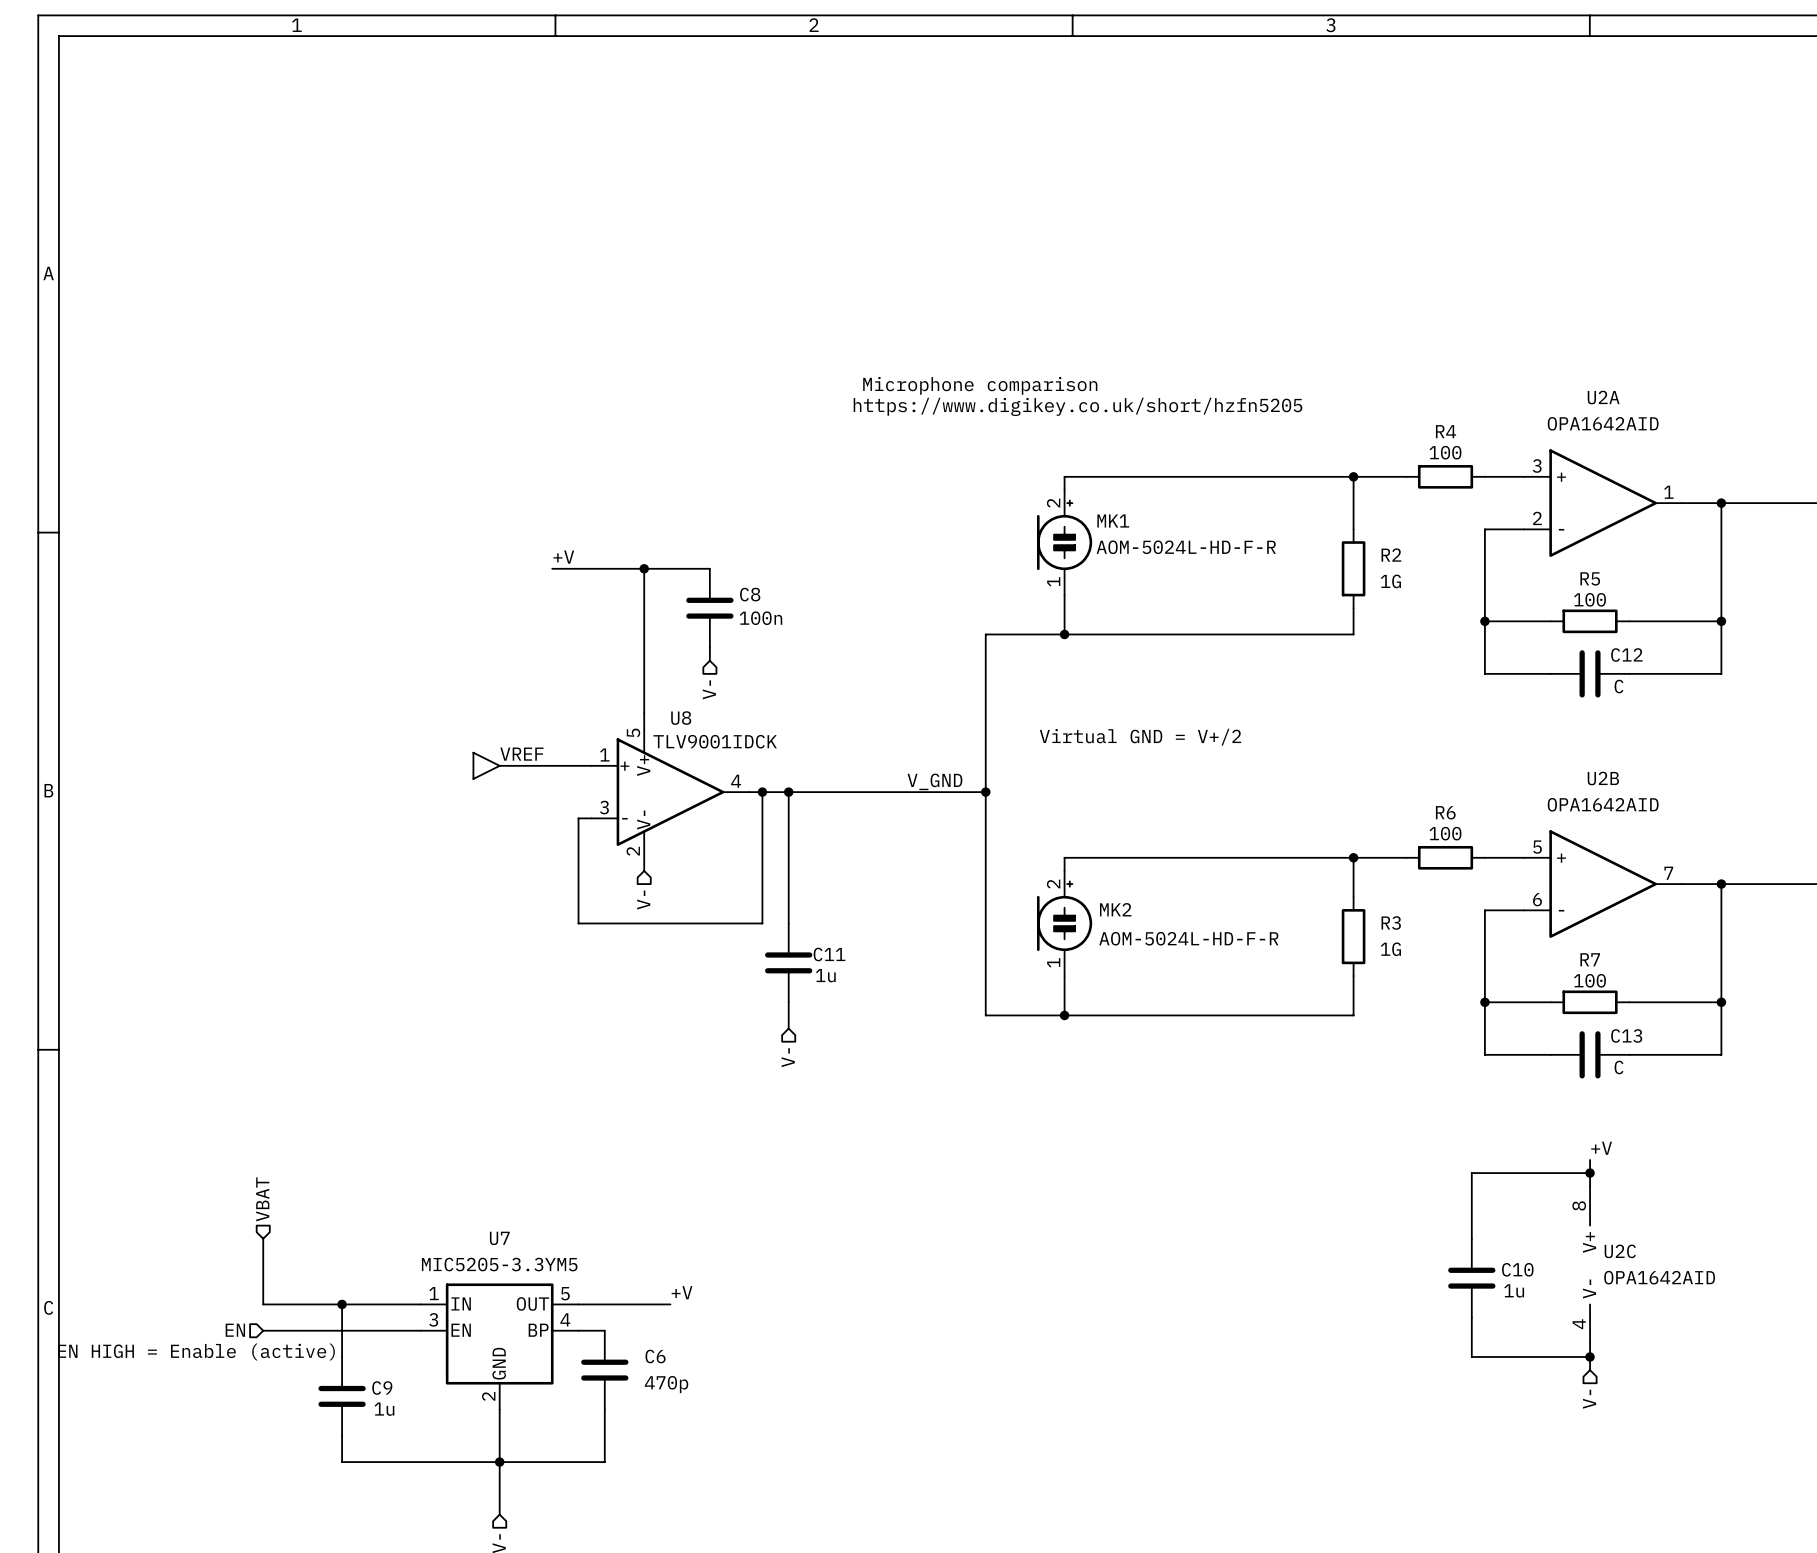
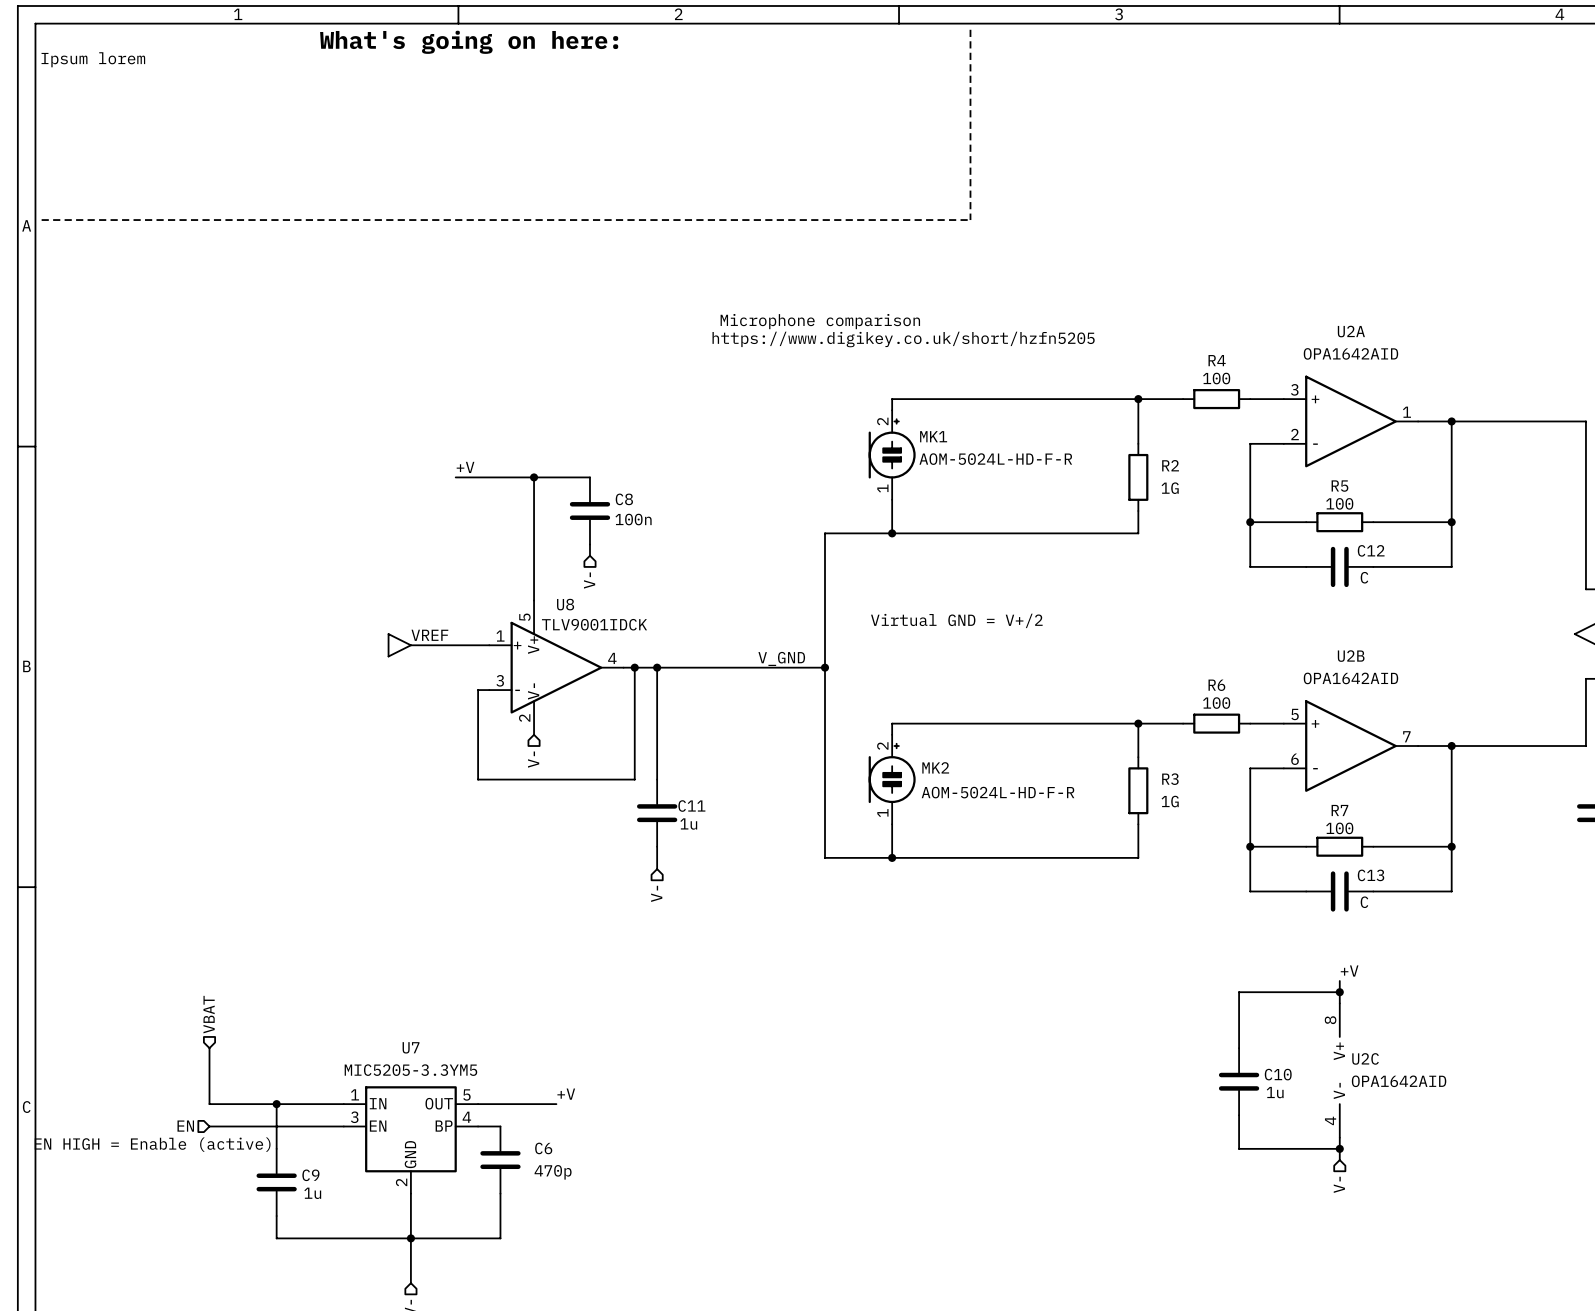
line: none -> (970, 29) (970, 220) (41, 220)
text: none -> What's going on here: (469, 42)
text: none -> Ipsum lorem (93, 59)

